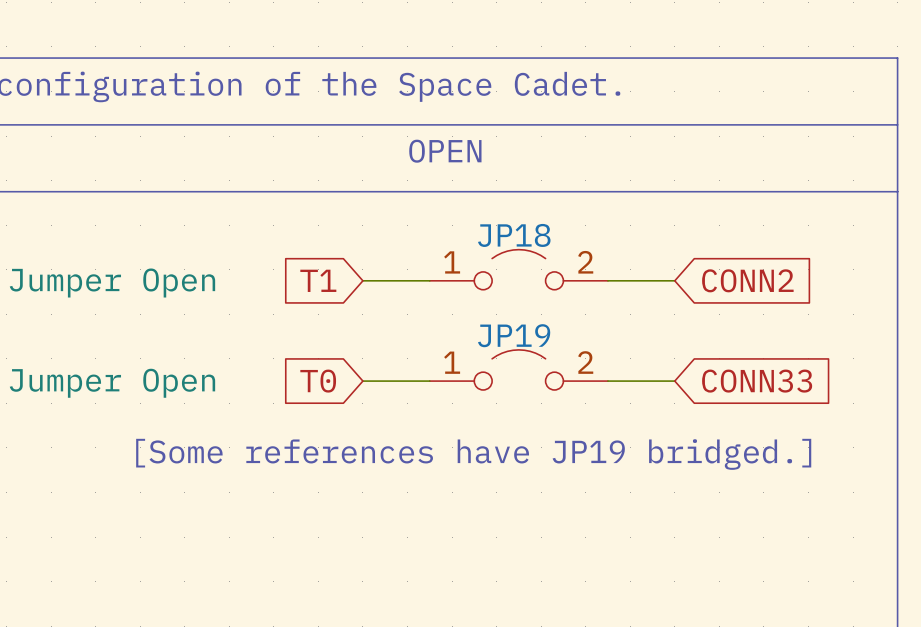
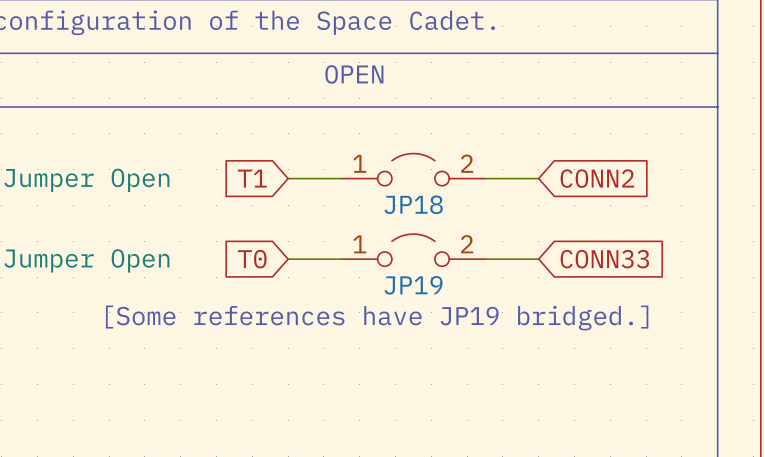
JP18 name position: JP18 (514, 235) -> JP18 (413, 204)
JP19 name position: JP19 (514, 335) -> JP19 (413, 285)

